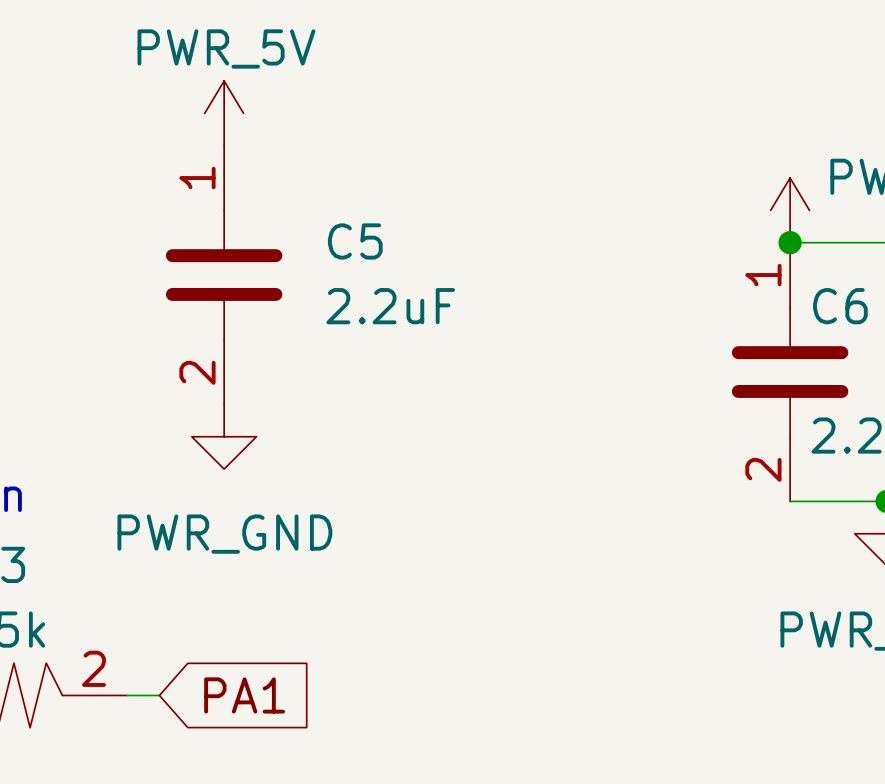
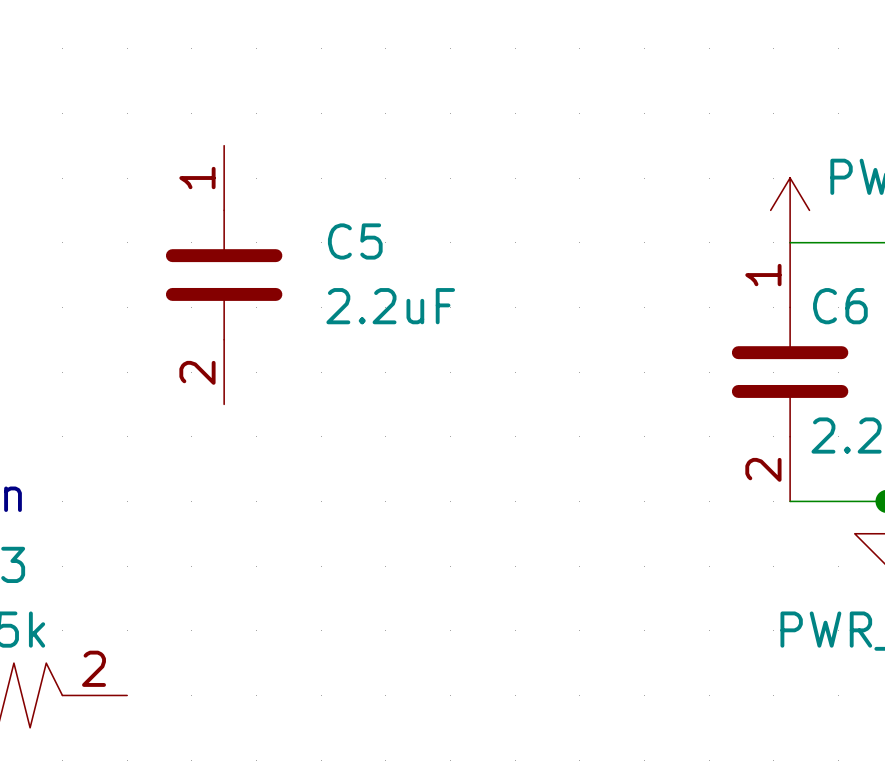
power symbol: PWR_5V (224, 113) -> none
junction: (790, 242) -> none
power symbol: PWR_GND (224, 436) -> none
wire: (127, 695) (159, 695) -> none
global label: PA1 (244, 695) -> none

